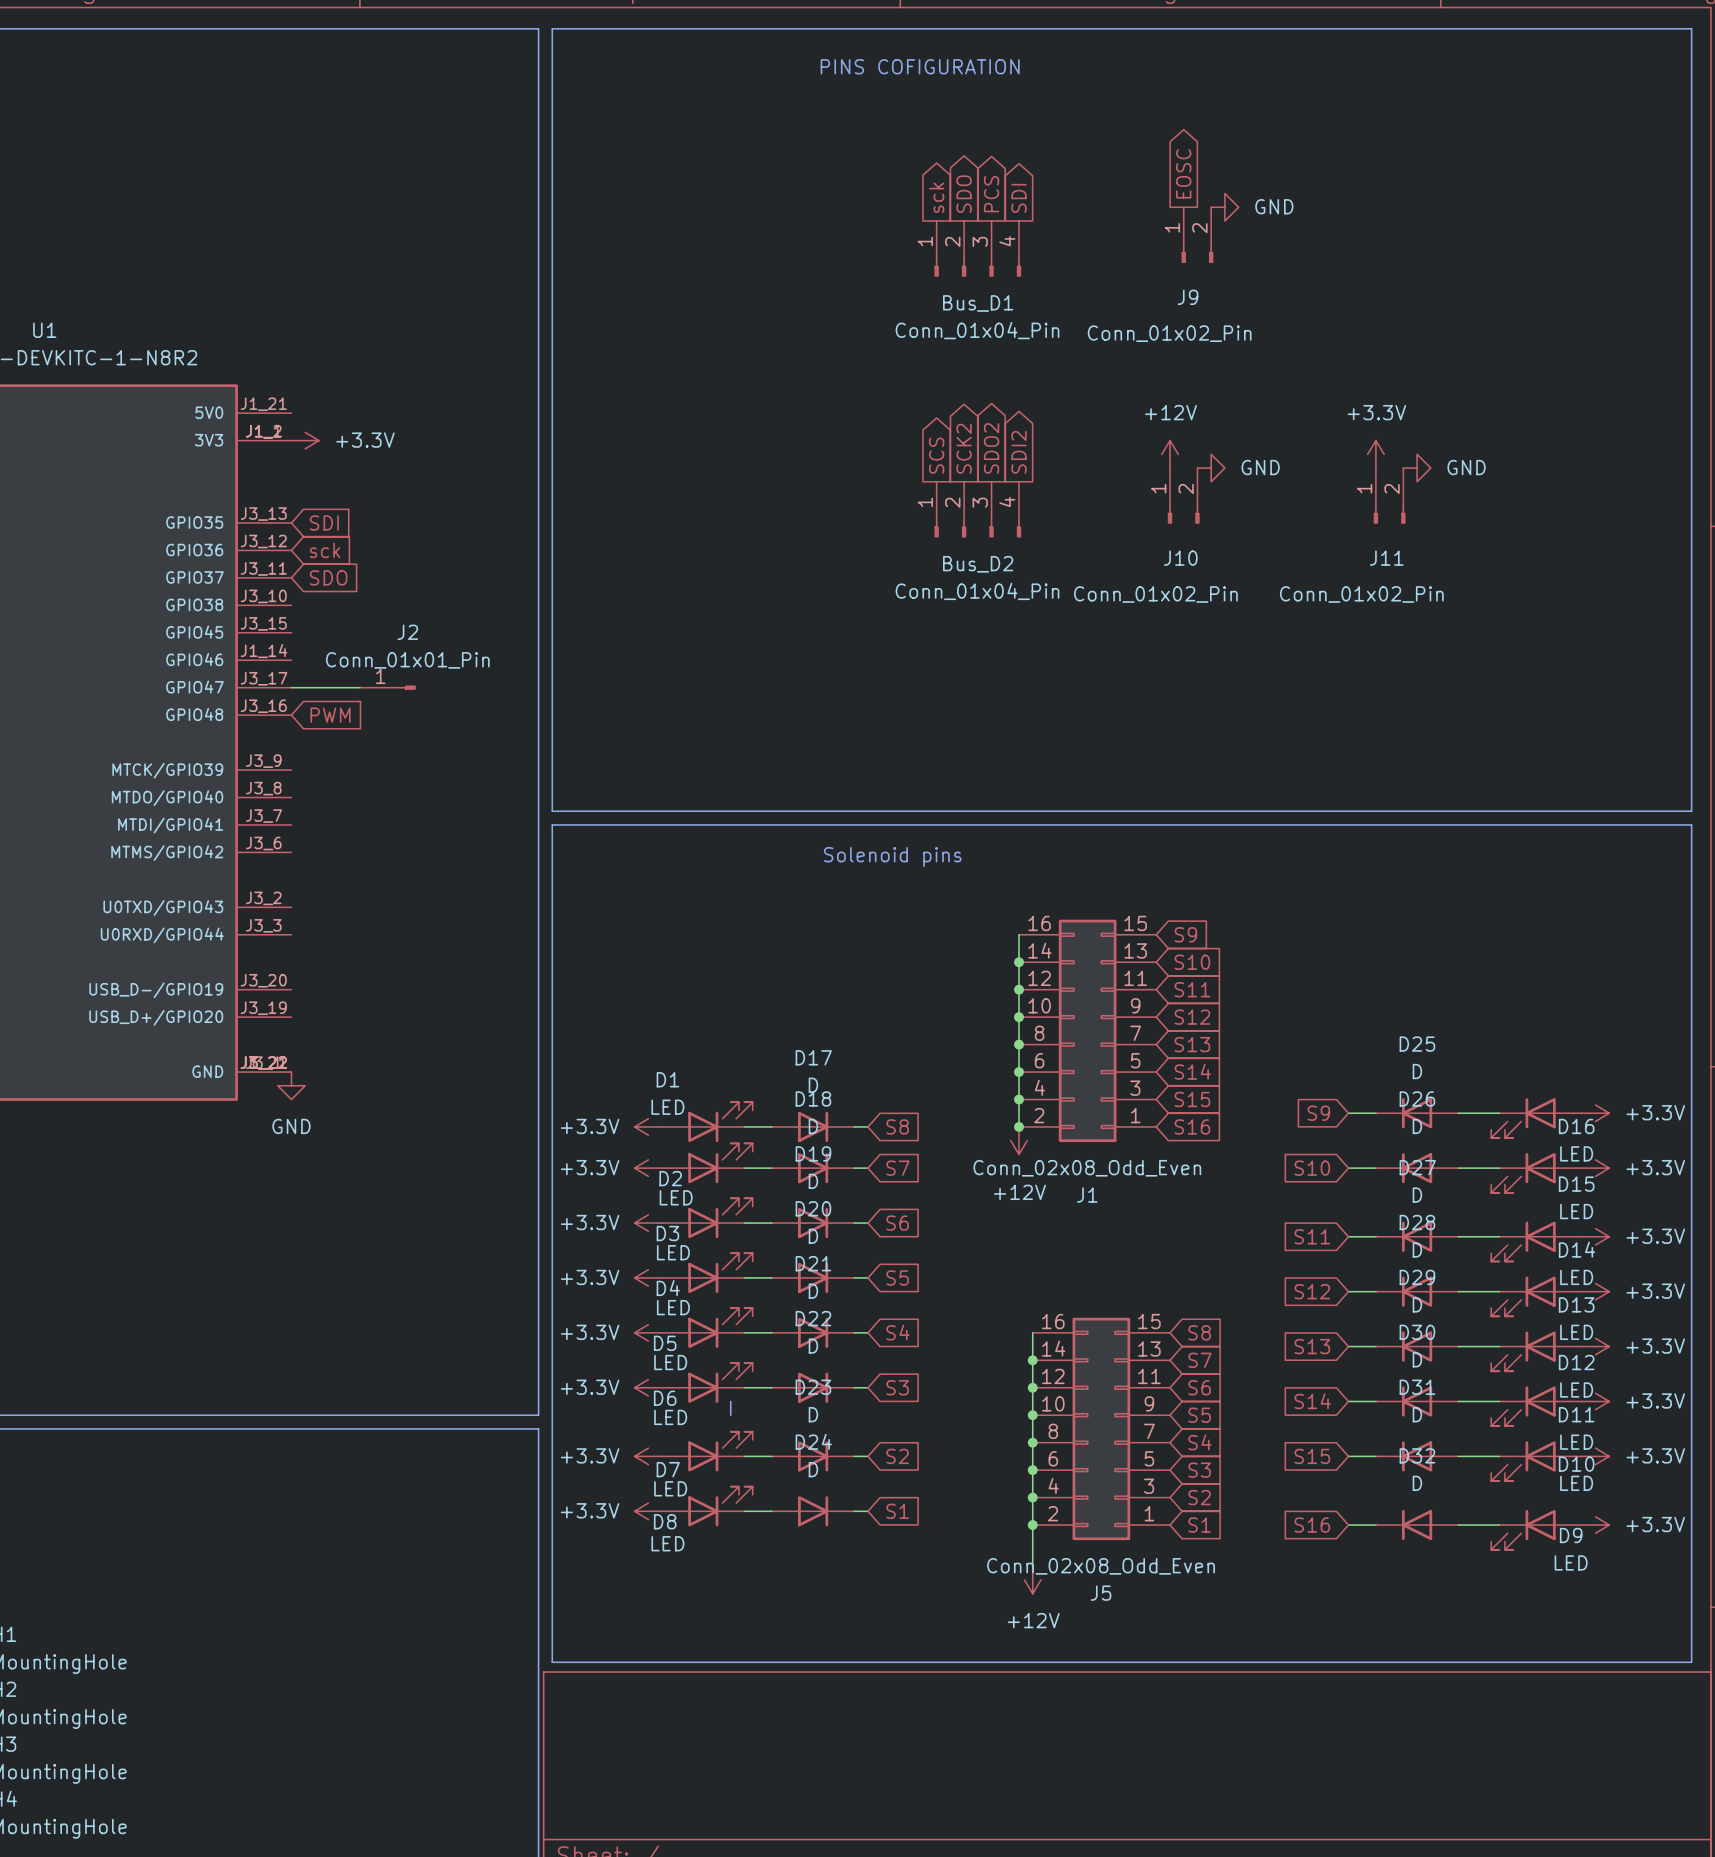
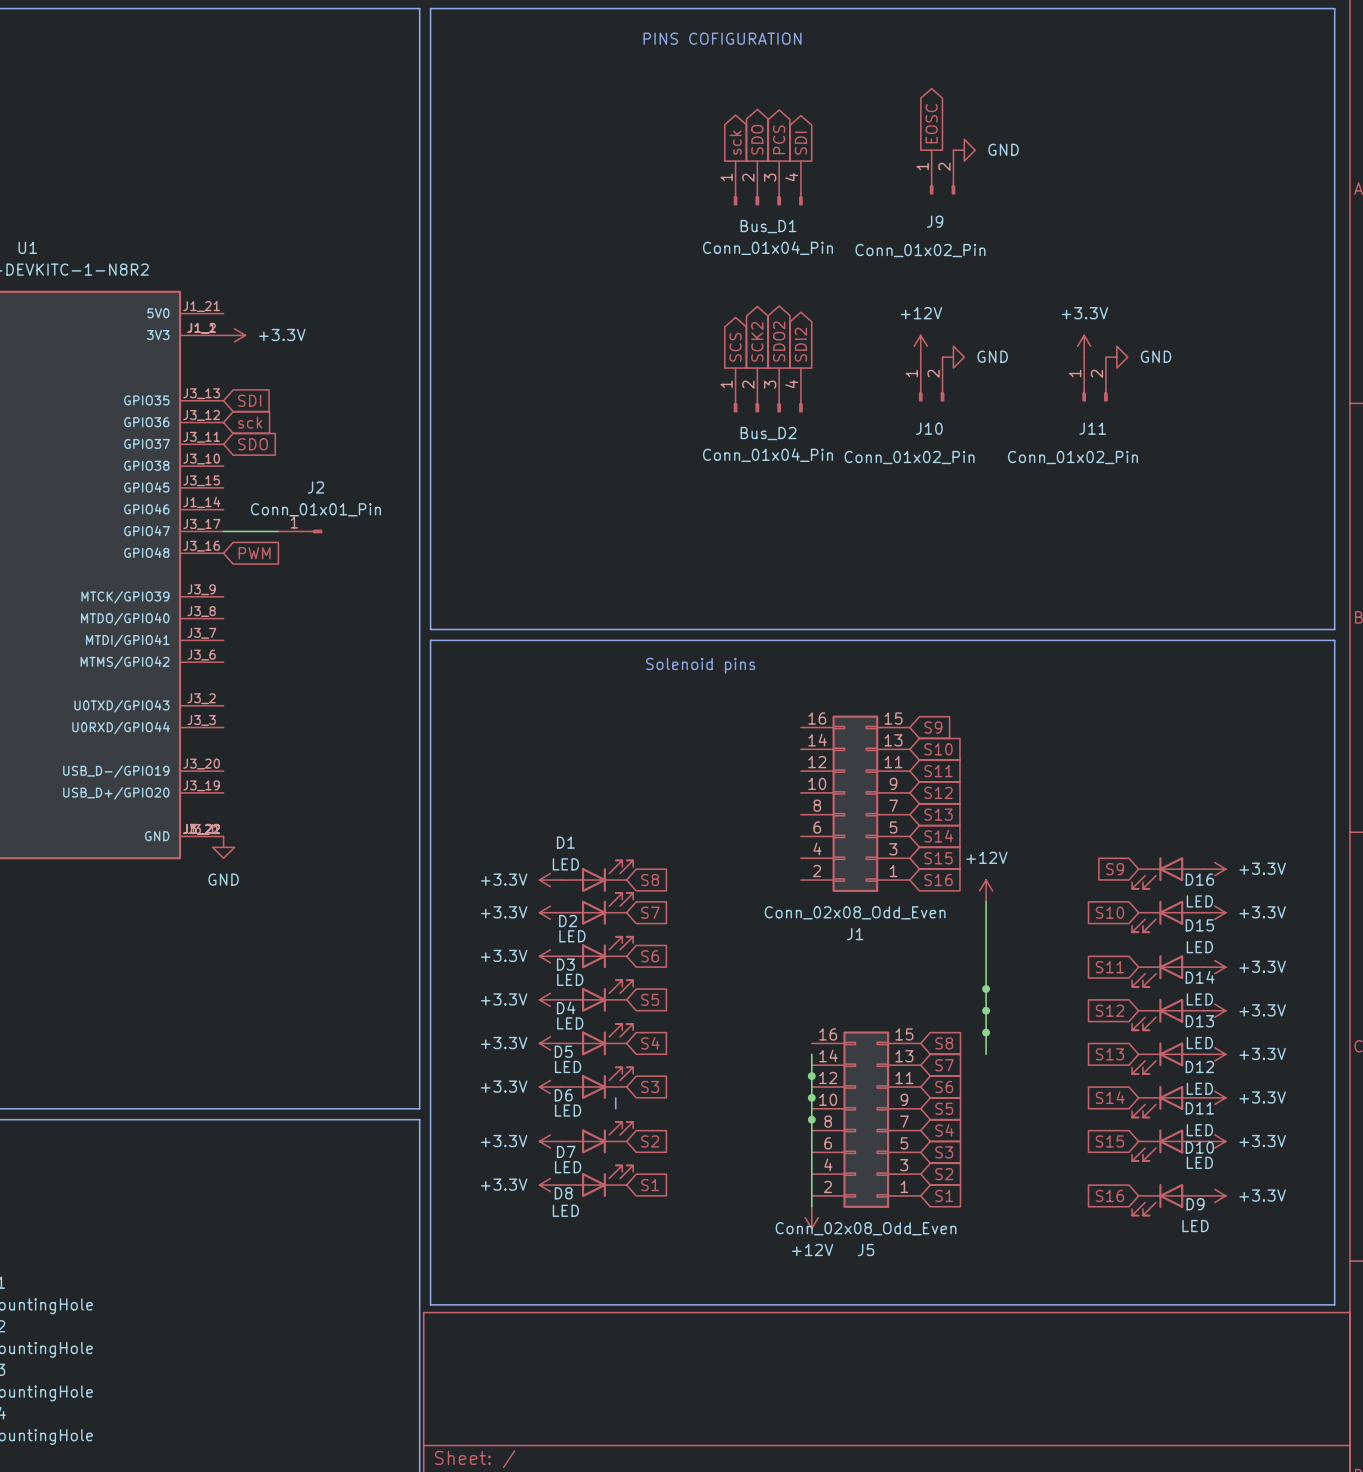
wire: (1019, 934) (1019, 1126) -> none
junction: (1019, 962) -> none
junction: (1019, 989) -> none
junction: (1019, 1017) -> none
junction: (1019, 1044) -> none
junction: (1019, 1072) -> none
junction: (1019, 1099) -> none
global label position: S9 (1318, 1113) -> S9 (1115, 869)
wire: (1348, 1113) (1375, 1113) -> none
D25: D (1417, 1113) -> none
power symbol: none -> +3.3V (1214, 869)
power symbol: +3.3V (1595, 1113) -> none
D16 position: (1536, 1118) -> (1168, 872)
D1 position: (707, 1122) -> (597, 876)
power symbol: +3.3V (648, 1126) -> none
power symbol: none -> +3.3V (550, 880)
D17: D (813, 1126) -> none
wire: (854, 1126) (868, 1126) -> none
global label position: S8 (897, 1126) -> S8 (650, 880)
junction: (1019, 1126) -> none
power symbol: +12V (1019, 1140) -> none
power symbol: none -> +12V (986, 890)
wire: none -> (986, 901) (986, 1054)
D2 position: (707, 1163) -> (597, 908)
power symbol: +3.3V (648, 1168) -> none
power symbol: none -> +3.3V (550, 912)
D18: D (813, 1168) -> none
wire: (854, 1168) (868, 1168) -> none
global label position: S7 (897, 1168) -> S7 (650, 912)
global label position: S10 (1312, 1168) -> S10 (1109, 912)
wire: (1348, 1168) (1375, 1168) -> none
D26: D (1417, 1168) -> none
power symbol: none -> +3.3V (1214, 912)
power symbol: +3.3V (1595, 1168) -> none
D15 position: (1536, 1172) -> (1168, 916)
D3 position: (707, 1218) -> (597, 952)
power symbol: +3.3V (648, 1223) -> none
power symbol: none -> +3.3V (550, 956)
D19: D (813, 1223) -> none
wire: (854, 1223) (868, 1223) -> none
global label position: S6 (897, 1223) -> S6 (650, 956)
global label position: S11 (1312, 1236) -> S11 (1109, 967)
wire: (1348, 1236) (1375, 1236) -> none
D27: D (1417, 1236) -> none
power symbol: none -> +3.3V (1214, 967)
power symbol: +3.3V (1595, 1236) -> none
D14 position: (1536, 1241) -> (1168, 970)
junction: none -> (986, 988)
D4 position: (707, 1273) -> (597, 996)
power symbol: +3.3V (648, 1277) -> none
power symbol: none -> +3.3V (550, 999)
D20: D (813, 1277) -> none
wire: (854, 1277) (868, 1277) -> none
global label position: S5 (897, 1277) -> S5 (650, 999)
junction: none -> (986, 1010)
global label position: S12 (1312, 1291) -> S12 (1109, 1010)
wire: (1348, 1291) (1375, 1291) -> none
D28: D (1417, 1291) -> none
power symbol: none -> +3.3V (1214, 1010)
power symbol: +3.3V (1595, 1291) -> none
D13 position: (1536, 1296) -> (1168, 1014)
junction: none -> (986, 1032)
D5 position: (707, 1328) -> (597, 1039)
power symbol: +3.3V (648, 1332) -> none
power symbol: none -> +3.3V (550, 1043)
D21: D (813, 1332) -> none
wire: (854, 1332) (868, 1332) -> none
global label position: S4 (897, 1332) -> S4 (650, 1043)
wire: (1032, 1332) (1032, 1346) -> none
global label position: S13 (1312, 1346) -> S13 (1109, 1054)
wire: (1348, 1346) (1375, 1346) -> none
D29: D (1417, 1346) -> none
power symbol: none -> +3.3V (1214, 1054)
power symbol: +3.3V (1595, 1346) -> none
D12 position: (1536, 1351) -> (1168, 1058)
junction: (1032, 1360) -> none
junction: none -> (811, 1076)
D6 position: (707, 1382) -> (597, 1083)
power symbol: +3.3V (648, 1387) -> none
power symbol: none -> +3.3V (550, 1087)
D22: D (813, 1387) -> none
wire: (854, 1387) (868, 1387) -> none
global label position: S3 (897, 1387) -> S3 (650, 1087)
junction: (1032, 1387) -> none
line: (730, 1401) (730, 1415) -> (615, 1097) (615, 1108)
junction: none -> (811, 1097)
global label position: S14 (1312, 1401) -> S14 (1110, 1097)
wire: (1348, 1401) (1375, 1401) -> none
D30: D (1417, 1401) -> none
power symbol: none -> +3.3V (1214, 1097)
power symbol: +3.3V (1595, 1401) -> none
D11 position: (1536, 1406) -> (1168, 1101)
junction: (1032, 1415) -> none
junction: none -> (811, 1119)
junction: (1032, 1442) -> none
D7 position: (707, 1451) -> (597, 1137)
power symbol: +3.3V (648, 1456) -> none
power symbol: none -> +3.3V (550, 1141)
D23: D (813, 1456) -> none
wire: (854, 1456) (868, 1456) -> none
global label position: S2 (897, 1456) -> S2 (650, 1141)
global label position: S15 (1312, 1456) -> S15 (1109, 1141)
wire: (1348, 1456) (1375, 1456) -> none
D31: D (1417, 1456) -> none
power symbol: none -> +3.3V (1214, 1141)
power symbol: +3.3V (1595, 1456) -> none
D10 position: (1536, 1461) -> (1168, 1145)
junction: (1032, 1470) -> none
junction: (1032, 1497) -> none
D8 position: (707, 1506) -> (597, 1181)
power symbol: +3.3V (648, 1511) -> none
power symbol: none -> +3.3V (550, 1185)
D24: D (813, 1511) -> none
wire: (854, 1511) (868, 1511) -> none
global label position: S1 (897, 1511) -> S1 (650, 1185)
junction: (1032, 1525) -> none
global label position: S16 (1312, 1525) -> S16 (1109, 1195)
wire: (1348, 1525) (1375, 1525) -> none
D32: D (1417, 1525) -> none
power symbol: none -> +3.3V (1214, 1195)
power symbol: +3.3V (1595, 1525) -> none
D9 position: (1536, 1529) -> (1168, 1199)
power symbol position: +12V (1032, 1579) -> +12V (811, 1217)

